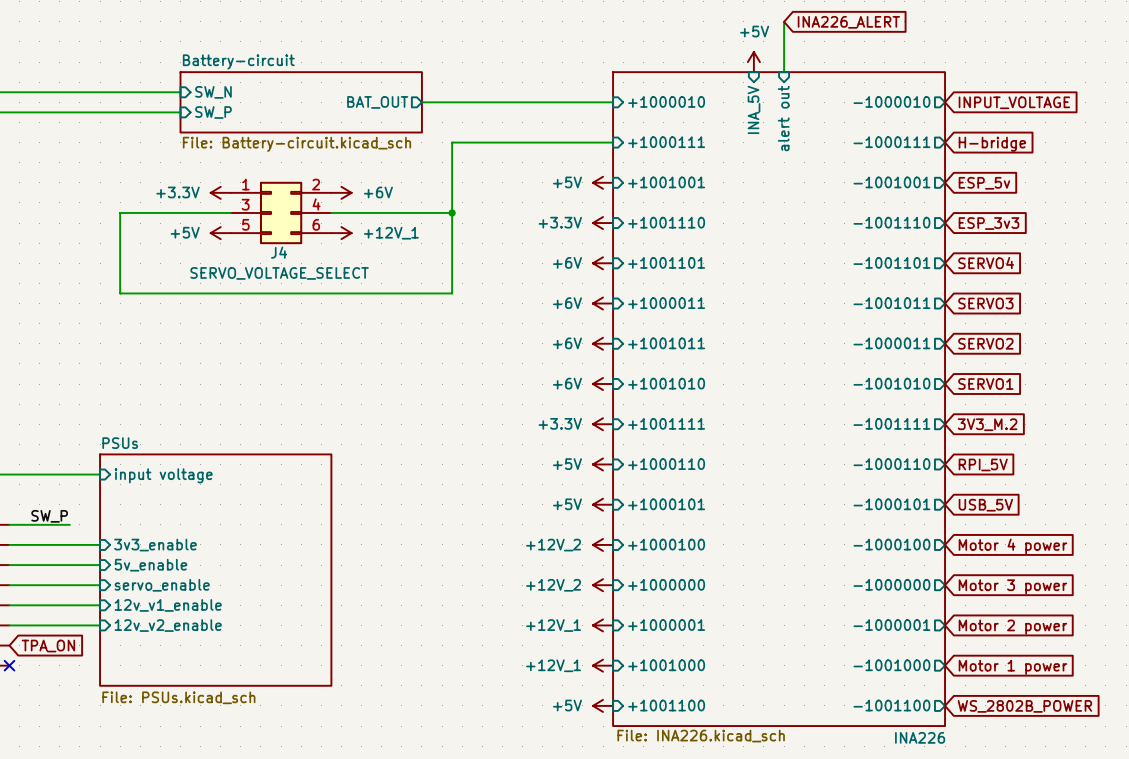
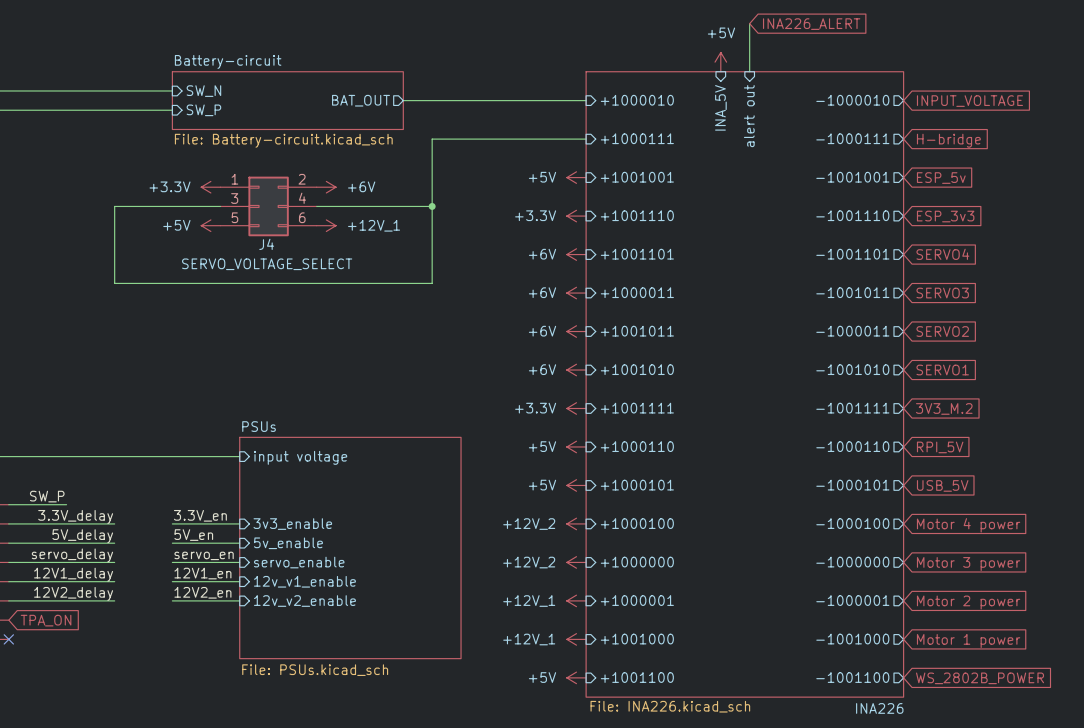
wire: none -> (95, 456) (239, 456)
sheet pin position: input voltage (163, 475) -> input voltage (300, 457)
label: none -> 3.3V_en (200, 515)
label: none -> 3.3V_delay (75, 516)
wire: none -> (95, 523) (114, 523)
wire: none -> (172, 523) (239, 523)
sheet pin position: 3v3_enable (155, 545) -> 3v3_enable (292, 524)
label: none -> 5V_en (193, 535)
label: none -> 5V_delay (82, 536)
wire: none -> (95, 543) (114, 543)
sheet pin position: 5v_enable (150, 565) -> 5v_enable (288, 543)
wire: none -> (172, 543) (239, 543)
sheet PSUs position: (215, 570) -> (350, 548)
label: none -> servo_delay (72, 555)
label: none -> servo_en (204, 555)
wire: none -> (95, 562) (114, 562)
sheet pin position: servo_enable (162, 585) -> servo_enable (299, 562)
wire: none -> (172, 562) (239, 562)
label: none -> 12V1_en (202, 573)
label: none -> 12V1_delay (73, 574)
wire: none -> (95, 581) (114, 581)
sheet pin position: 12v_v1_enable (168, 605) -> 12v_v1_enable (304, 581)
wire: none -> (172, 581) (239, 581)
label: none -> 12V2_en (202, 592)
label: none -> 12V2_delay (73, 593)
wire: none -> (95, 600) (114, 600)
sheet pin position: 12v_v2_enable (168, 625) -> 12v_v2_enable (304, 601)
wire: none -> (172, 600) (239, 600)

